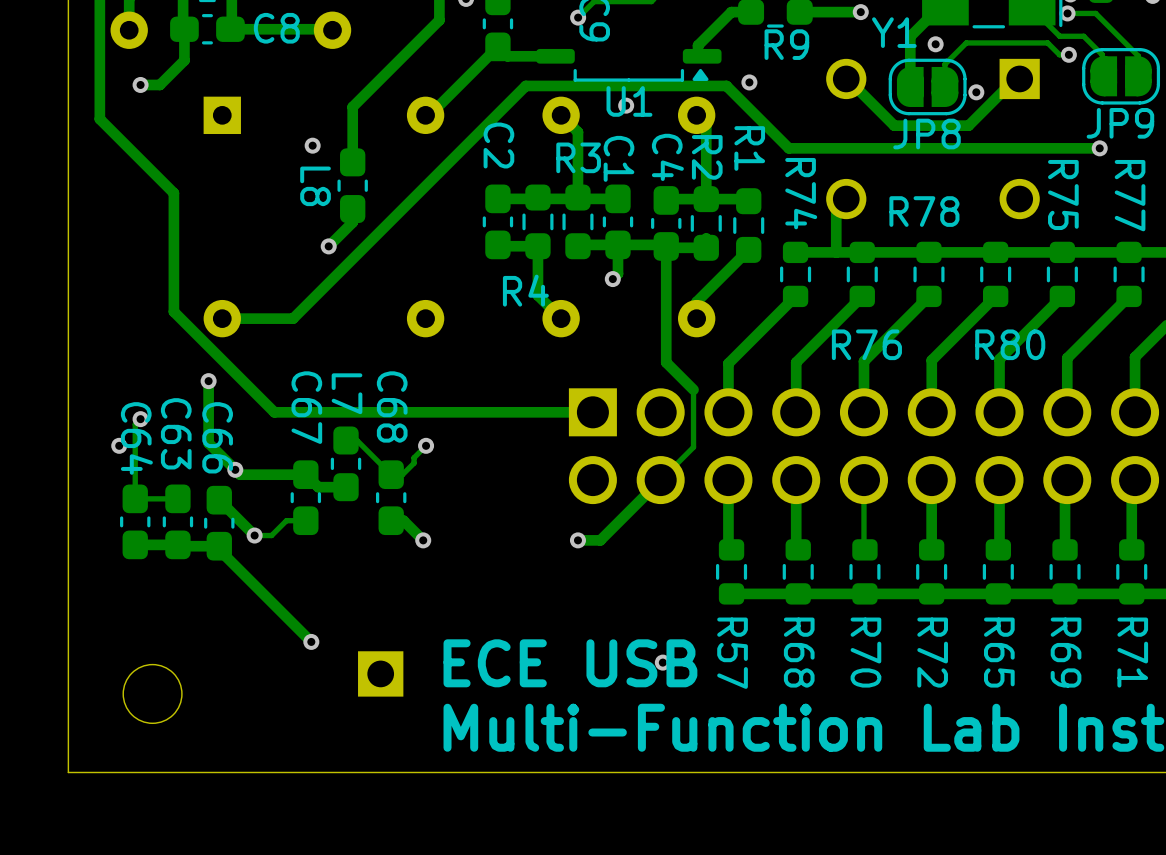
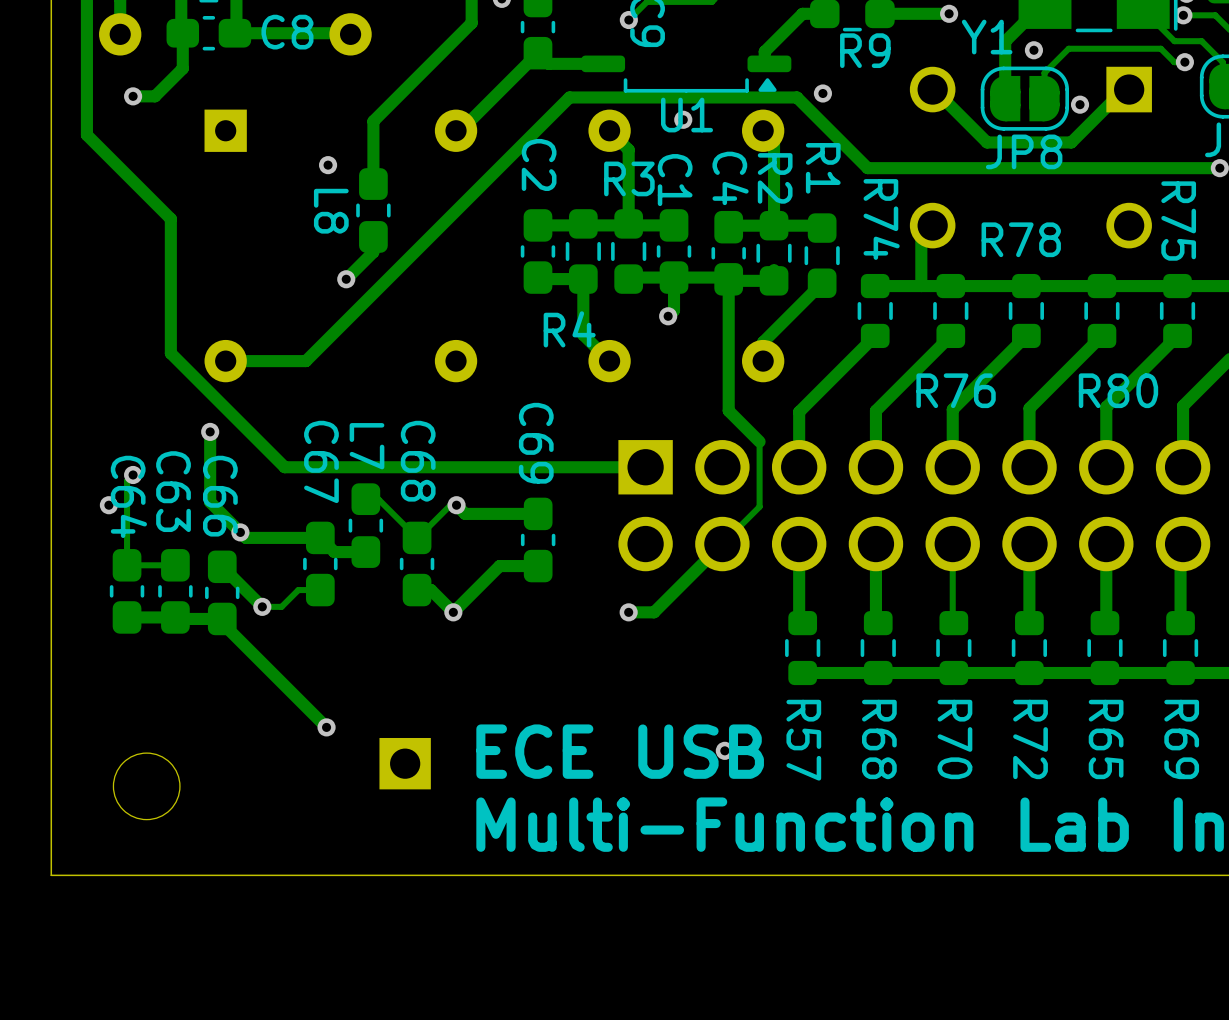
track: (426, 445) (414, 457) (414, 463) (402, 474) (391, 474) -> (538, 513) (465, 513) (456, 505) (450, 505) (417, 537)
C69: none -> (538, 539)
track: none -> (538, 566) (499, 566) (453, 612)

